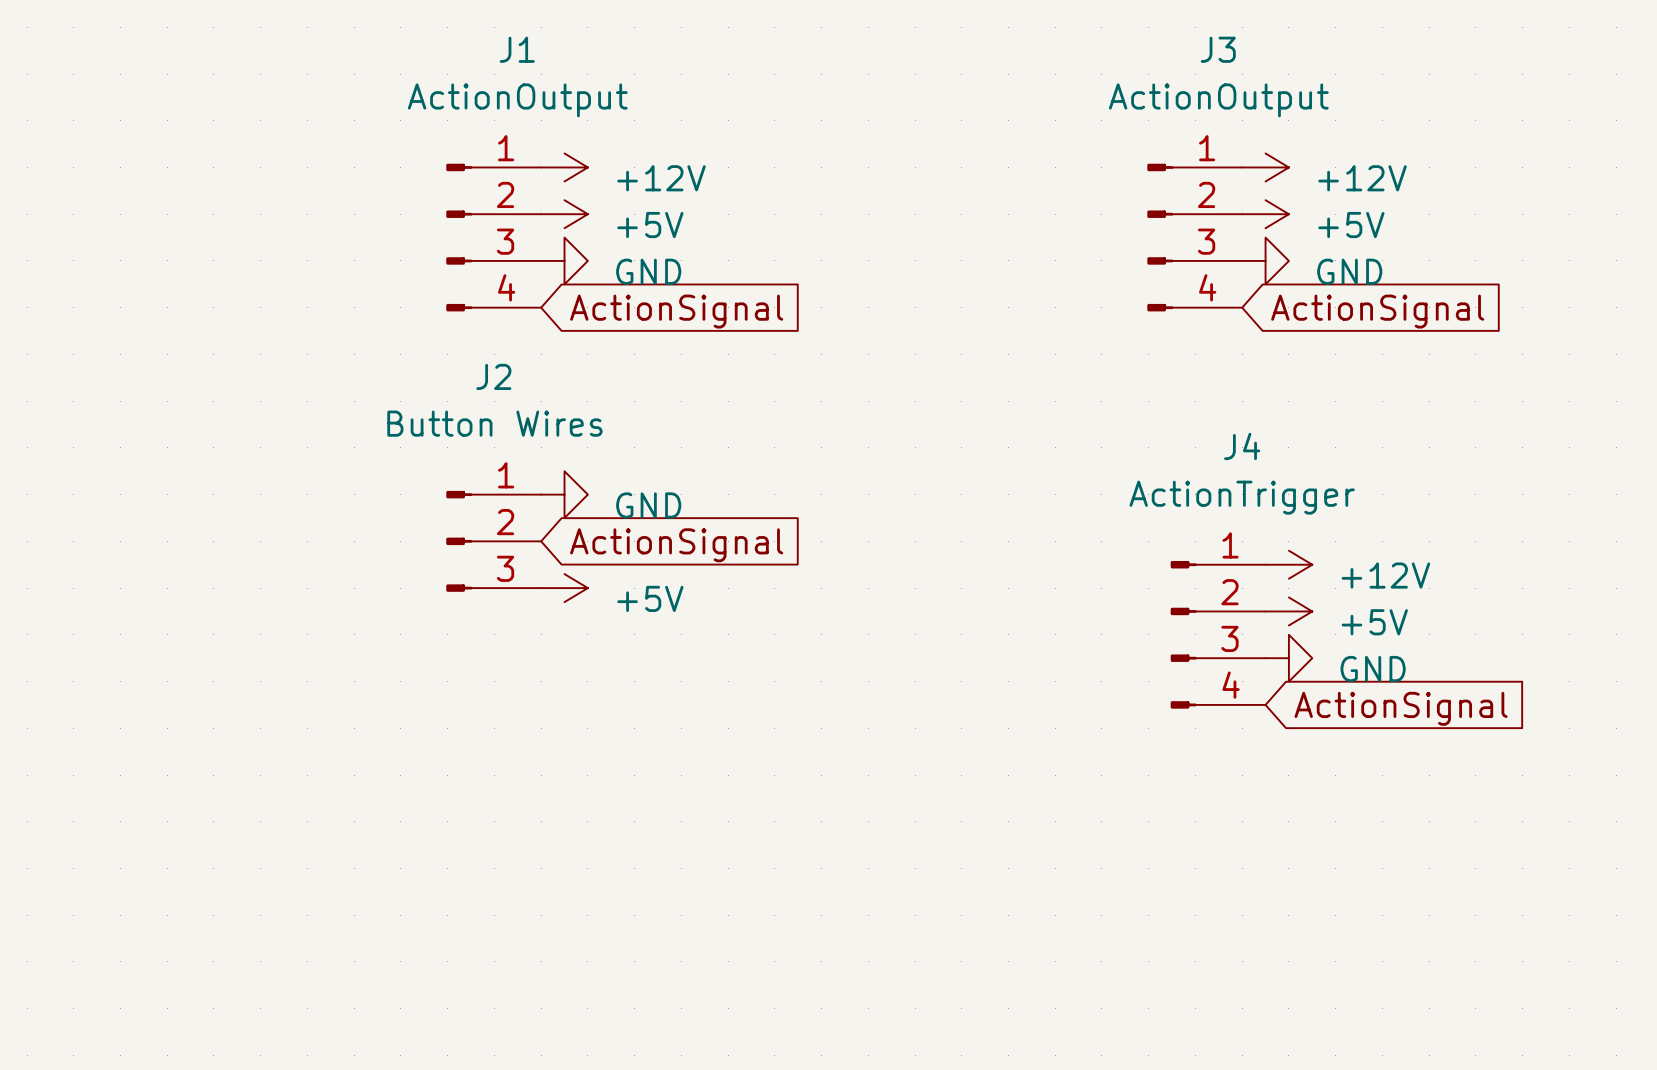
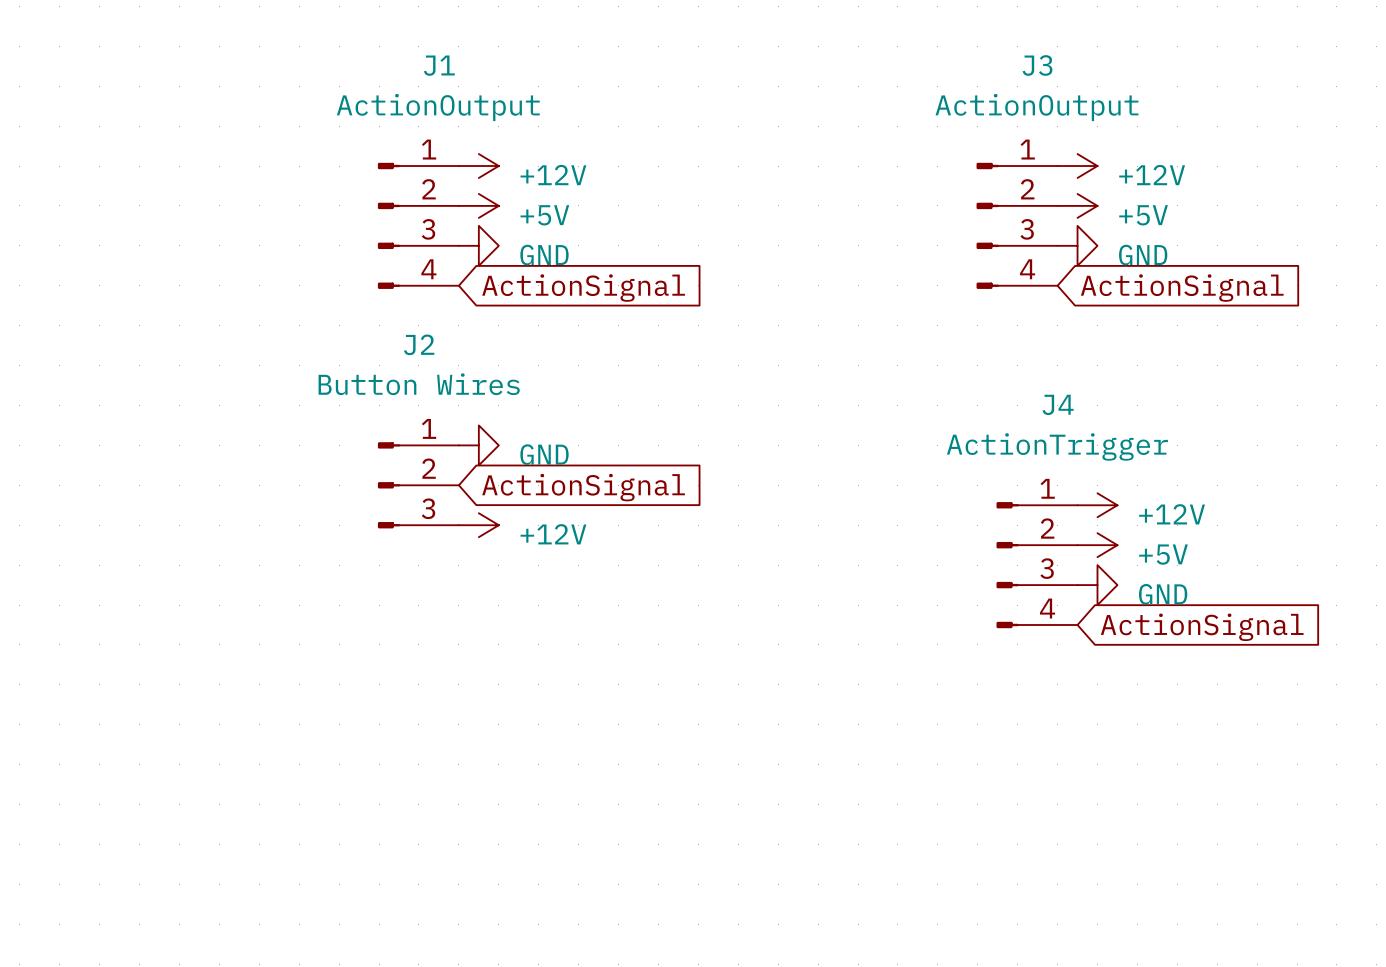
power symbol: +5V (564, 588) -> +12V (478, 525)

